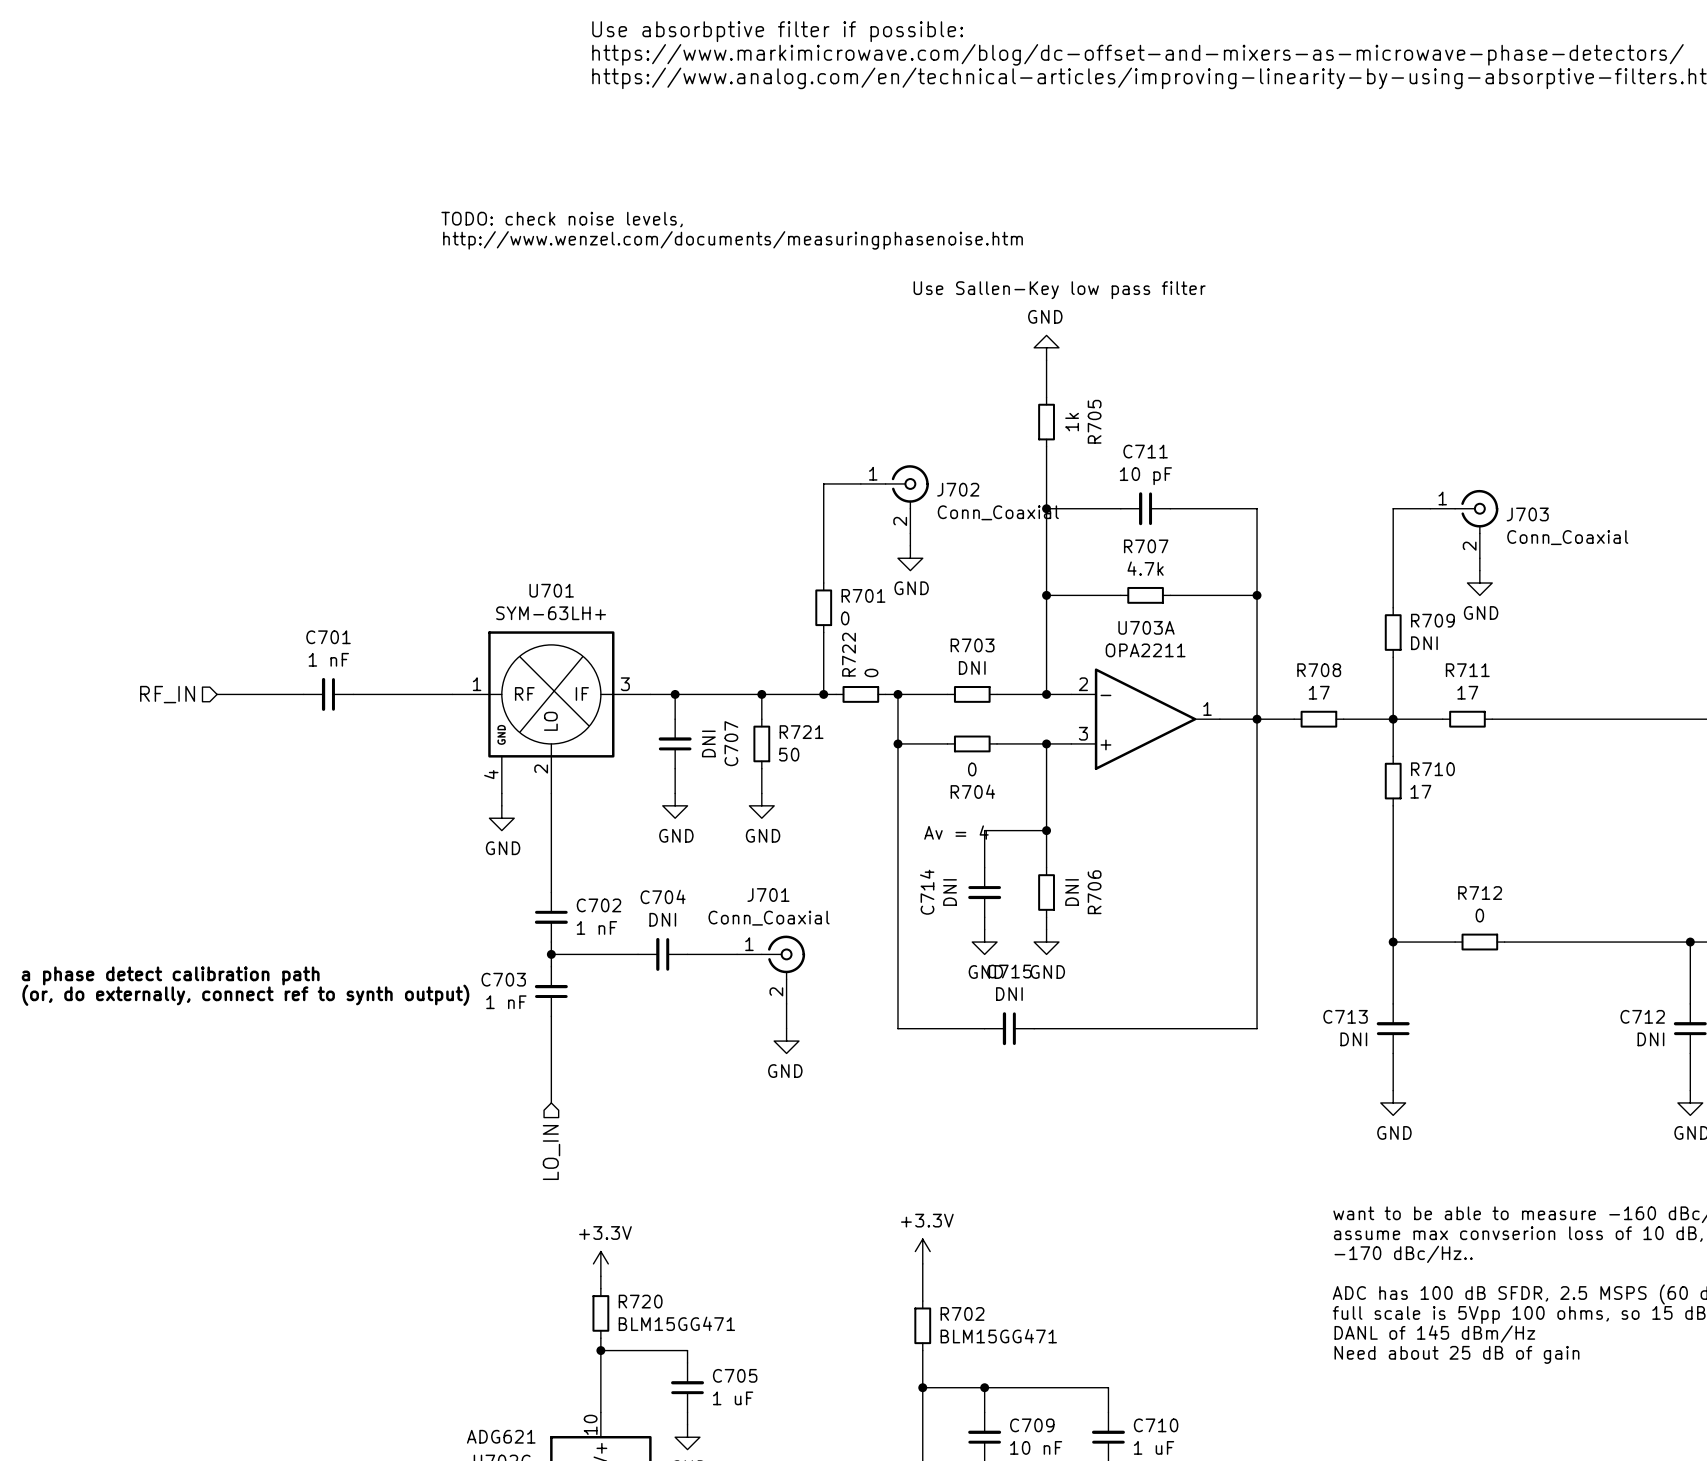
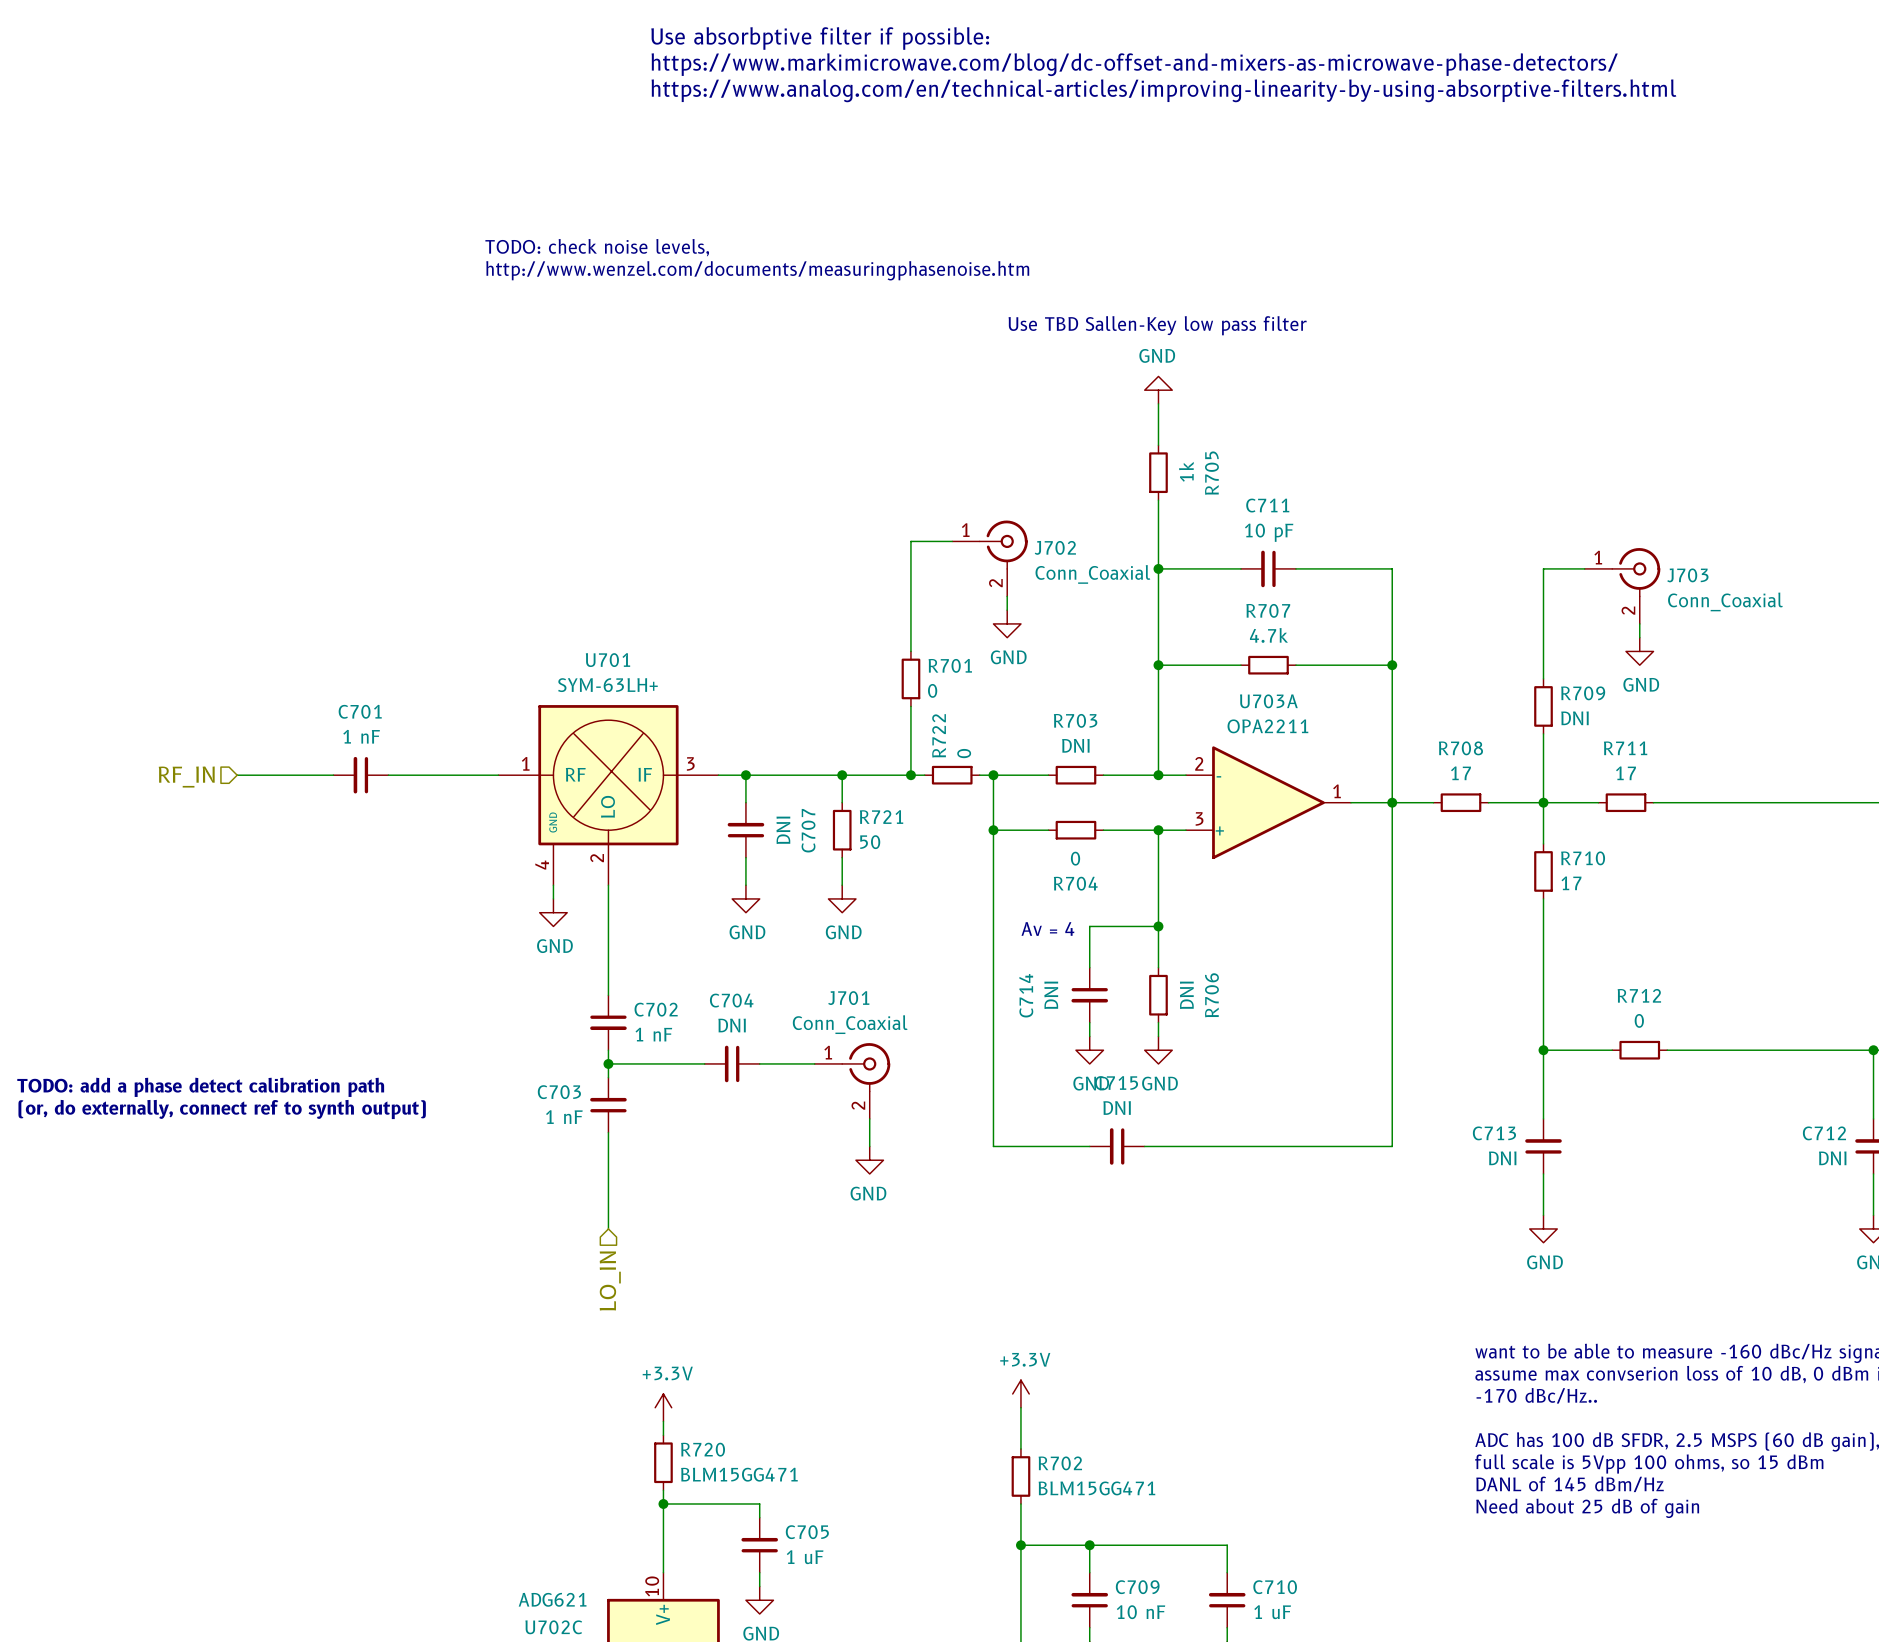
text: Use Sallen-Key low pass filter (1059, 290) -> Use TBD Sallen-Key low pass filter (1157, 325)
text: a phase detect calibration path (170, 975) -> TODO: add a phase detect calibration path (200, 1087)

